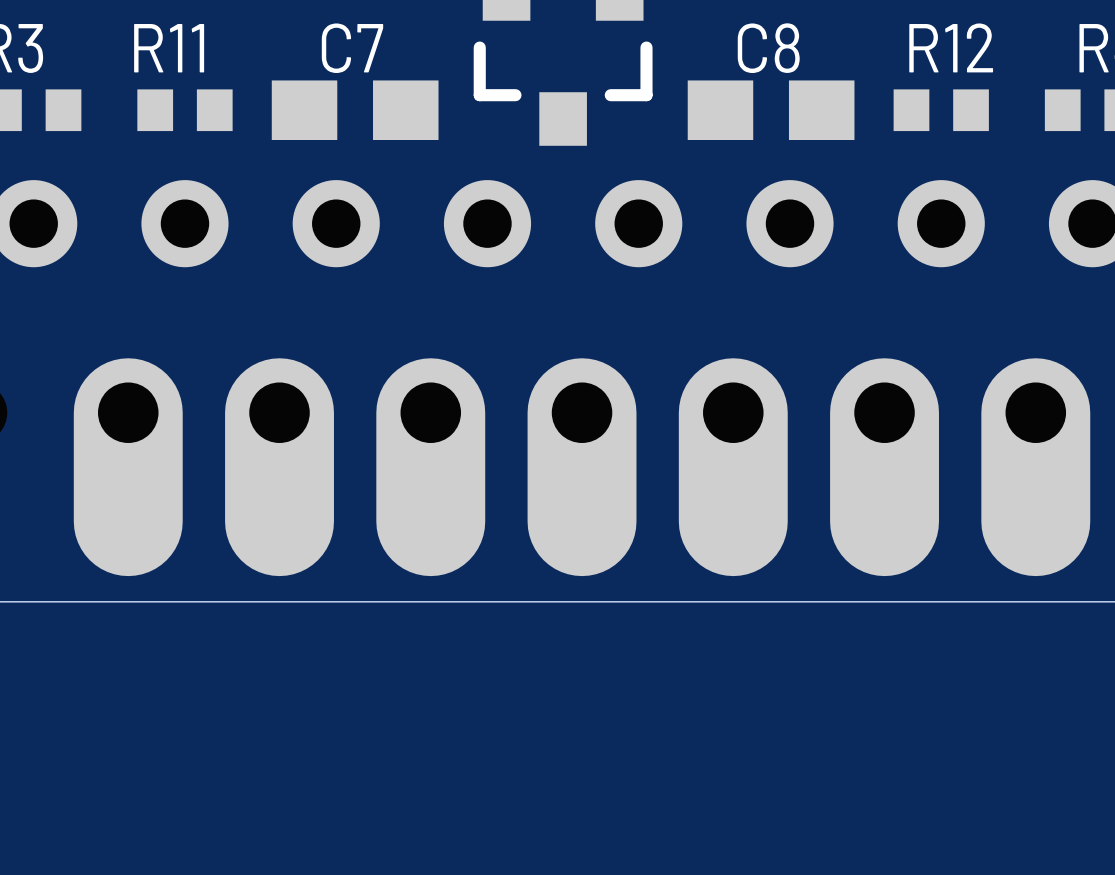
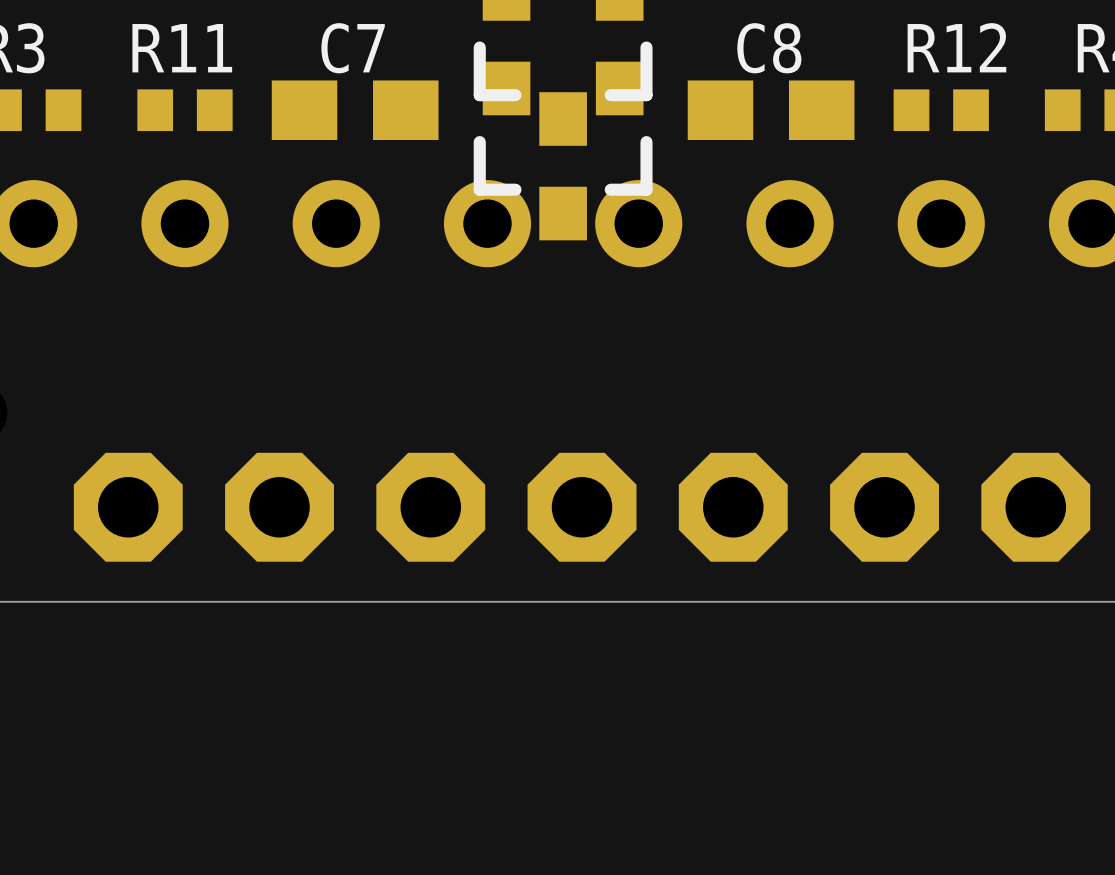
part: none -> (563, 151)
part footprint: [73, 358, 183, 577] -> [73, 452, 183, 562]
part footprint: [225, 358, 334, 577] -> [225, 452, 334, 562]
part footprint: [376, 358, 486, 577] -> [376, 452, 486, 562]
part footprint: [527, 358, 637, 577] -> [527, 452, 637, 562]
part footprint: [678, 358, 788, 577] -> [678, 452, 788, 562]
part footprint: [830, 358, 939, 577] -> [830, 452, 939, 562]
part footprint: [981, 358, 1091, 577] -> [981, 452, 1091, 562]

